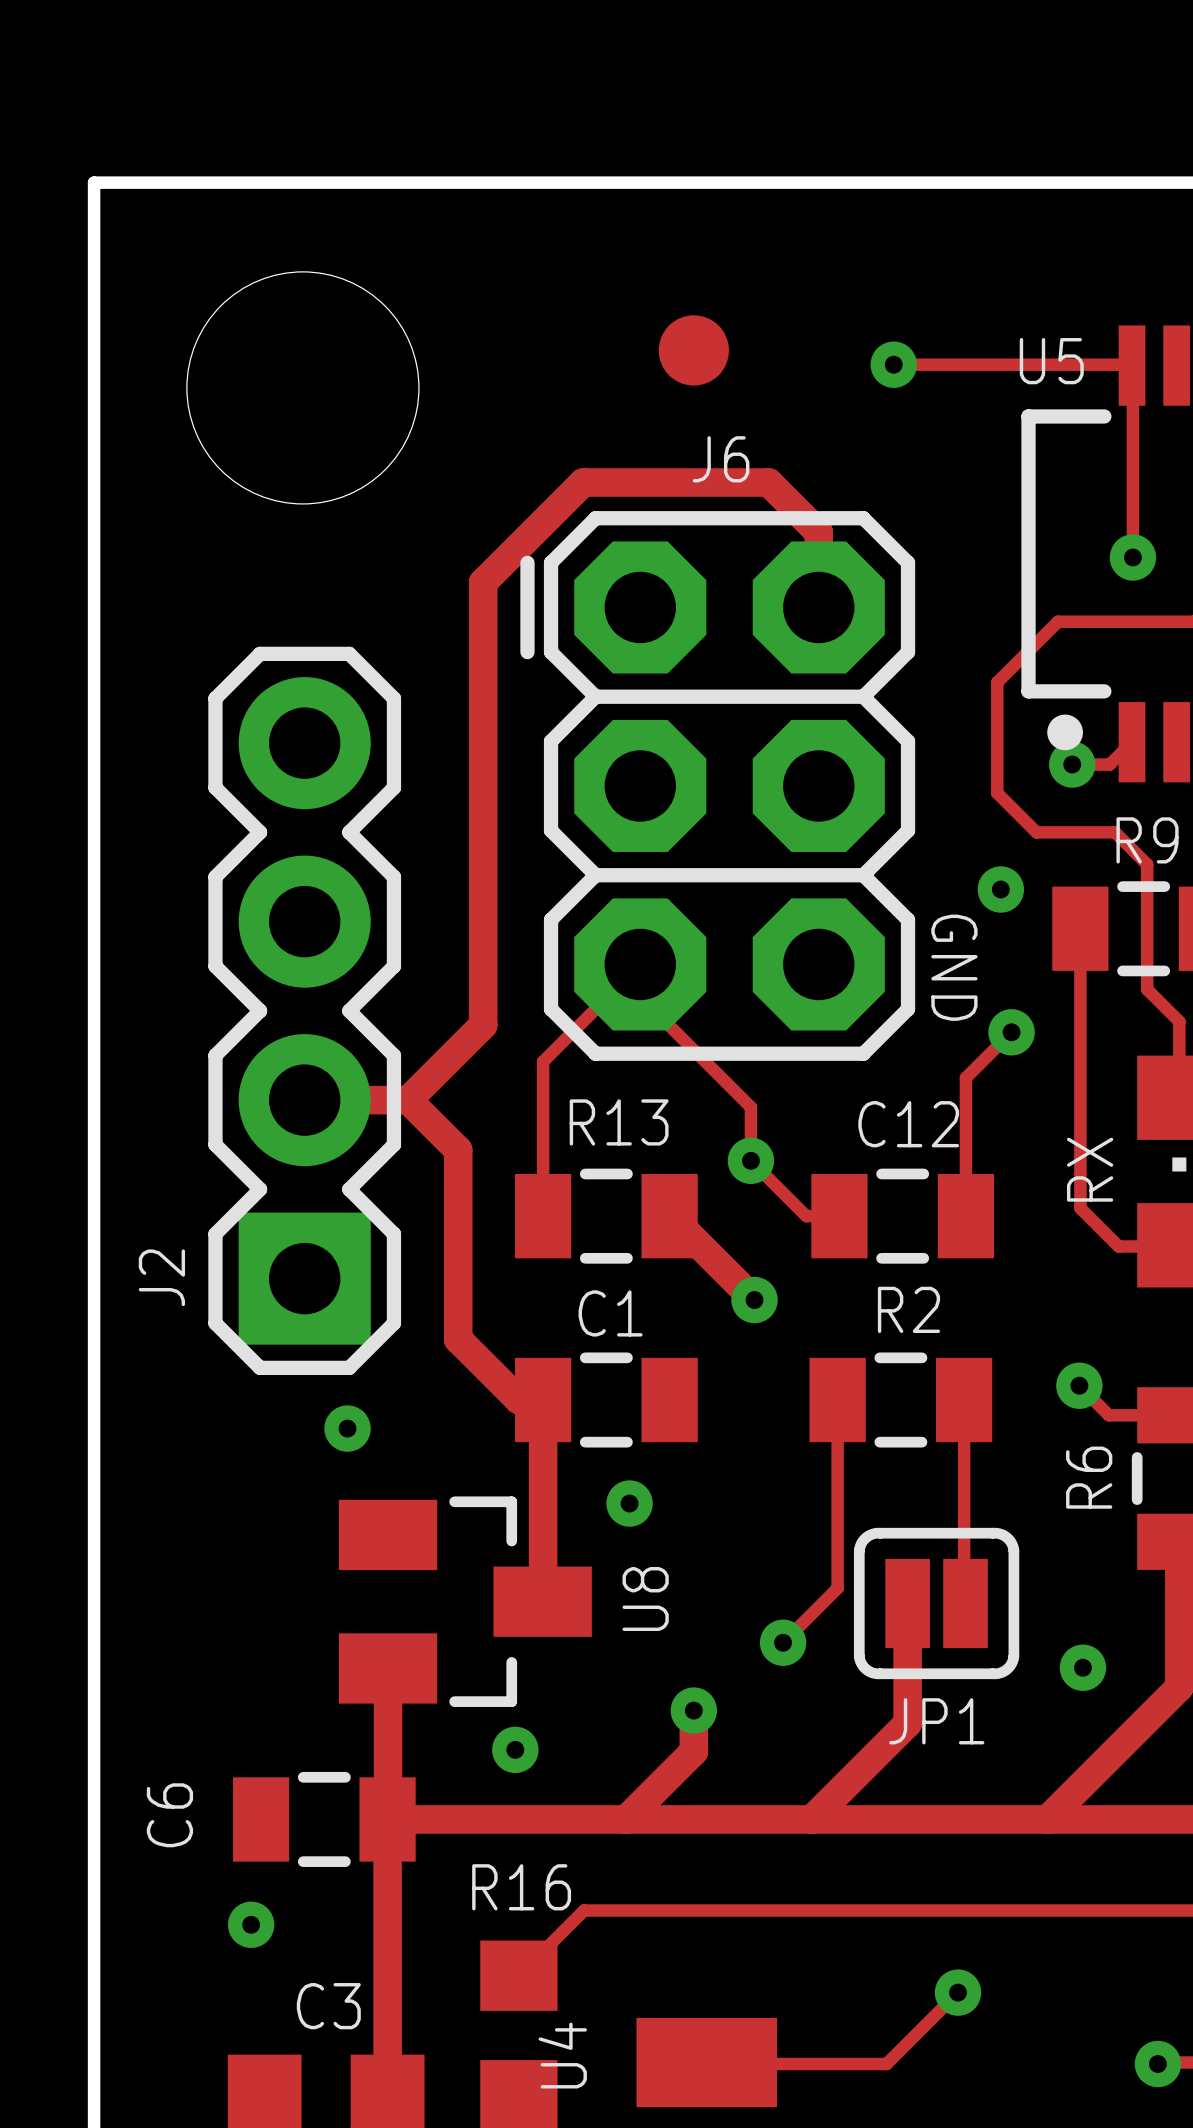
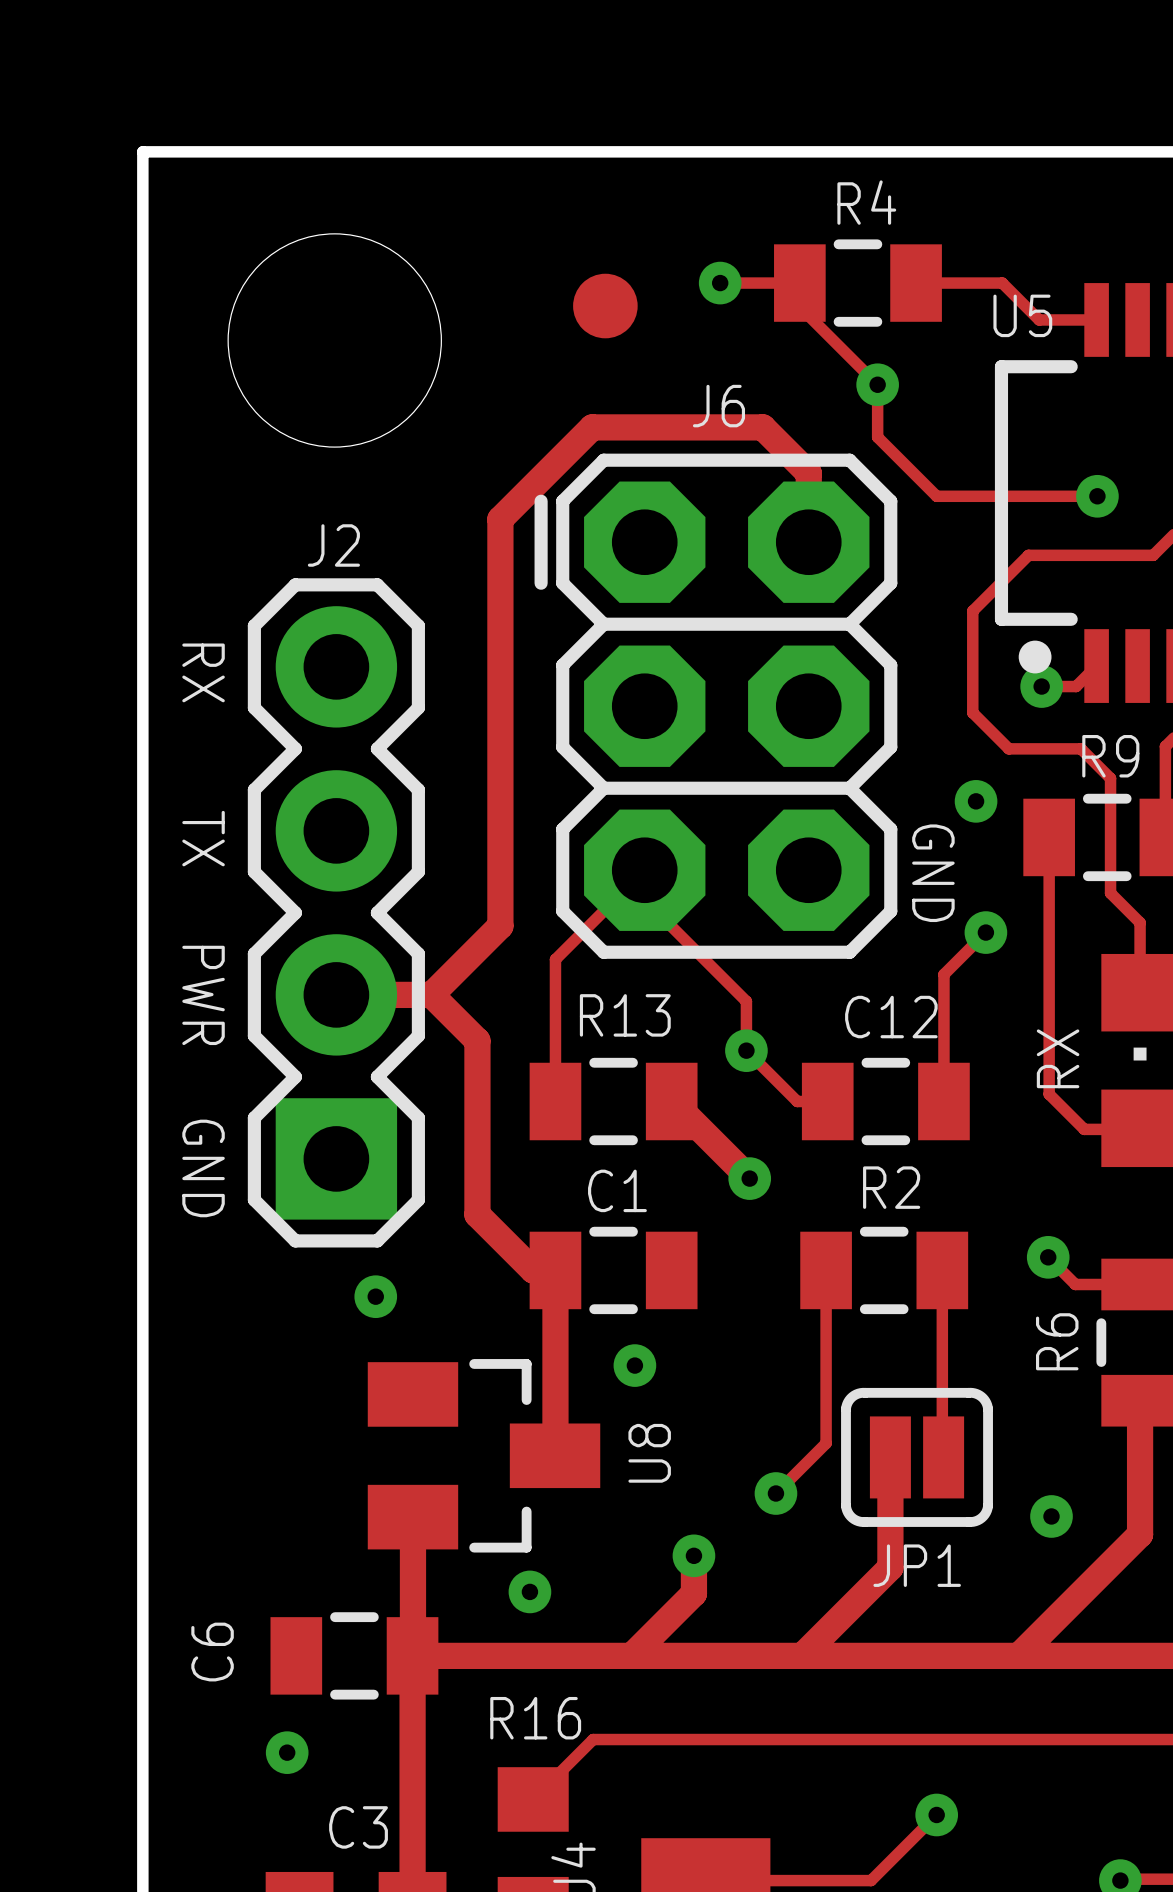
via: none -> (720, 283)
R4: none -> (857, 283)
part position: (693, 350) -> (605, 306)
track: (893, 364) (1131, 364) -> (916, 283) (1002, 283) (1039, 319) (1096, 319)
via position: (893, 364) -> (877, 384)
track: (1132, 366) (1132, 557) -> (720, 283) (799, 283) (799, 306) (877, 384) (877, 437) (936, 496) (1097, 496)
text: none -> RX (203, 672)
text: none -> TX (203, 838)
text: none -> PWR (203, 995)
J2 name rotation: 0° (161, 1277) -> 90° clockwise (333, 545)
J2 name position: J2 (161, 1277) -> J2 (333, 545)
text: none -> GND (203, 1168)

